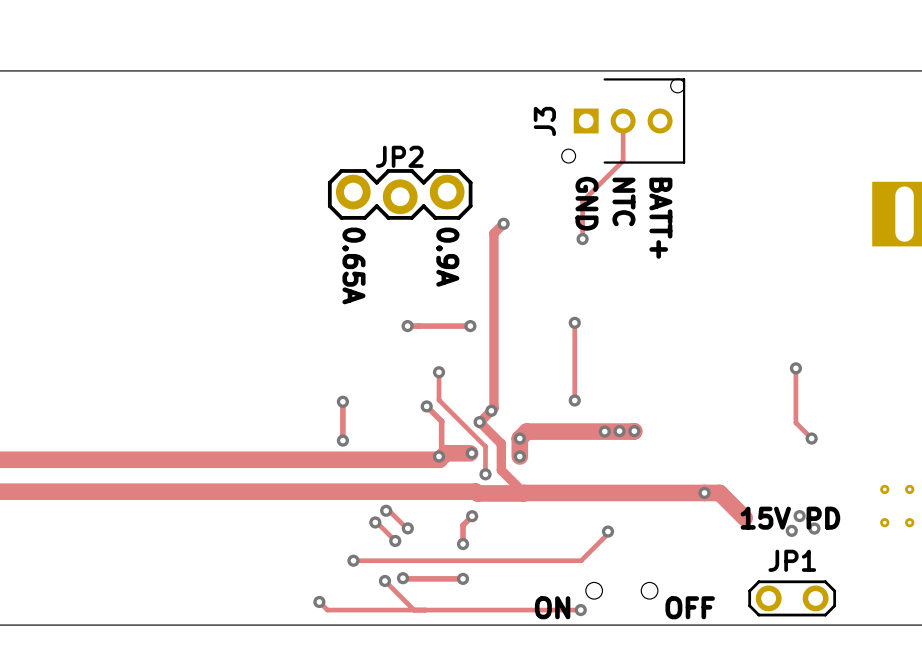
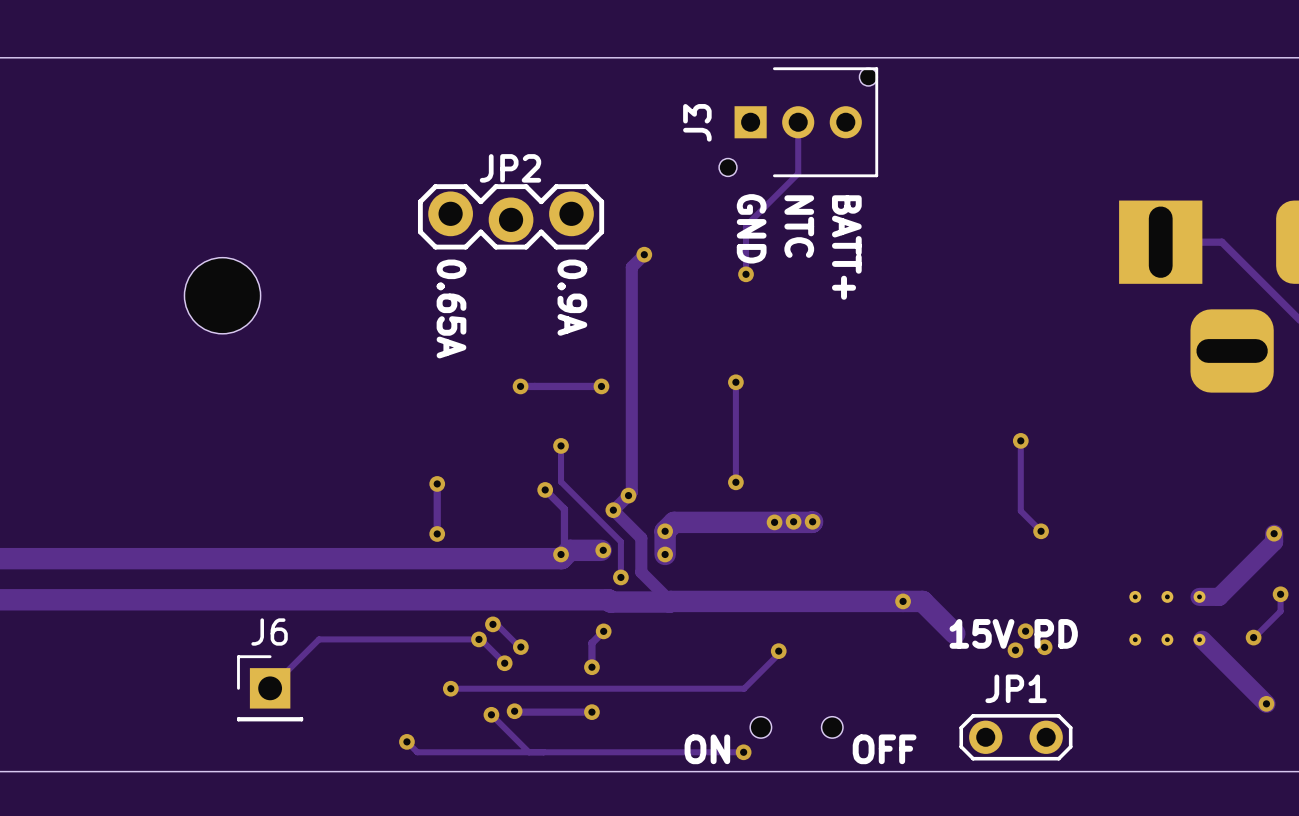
part: none -> (222, 295)
track: none -> (478, 639) (319, 639) (270, 688)
J6: none -> (270, 688)

